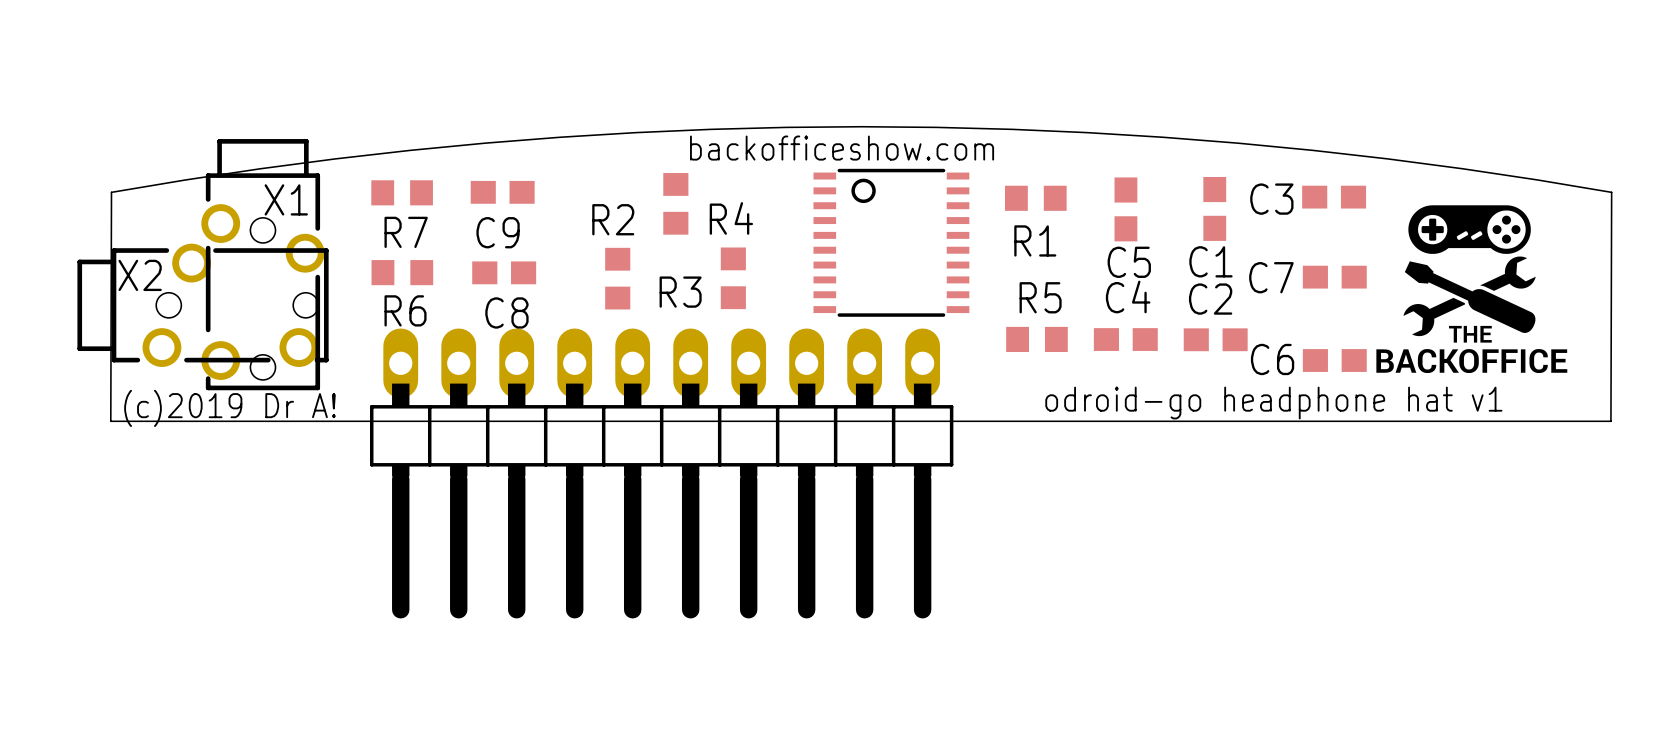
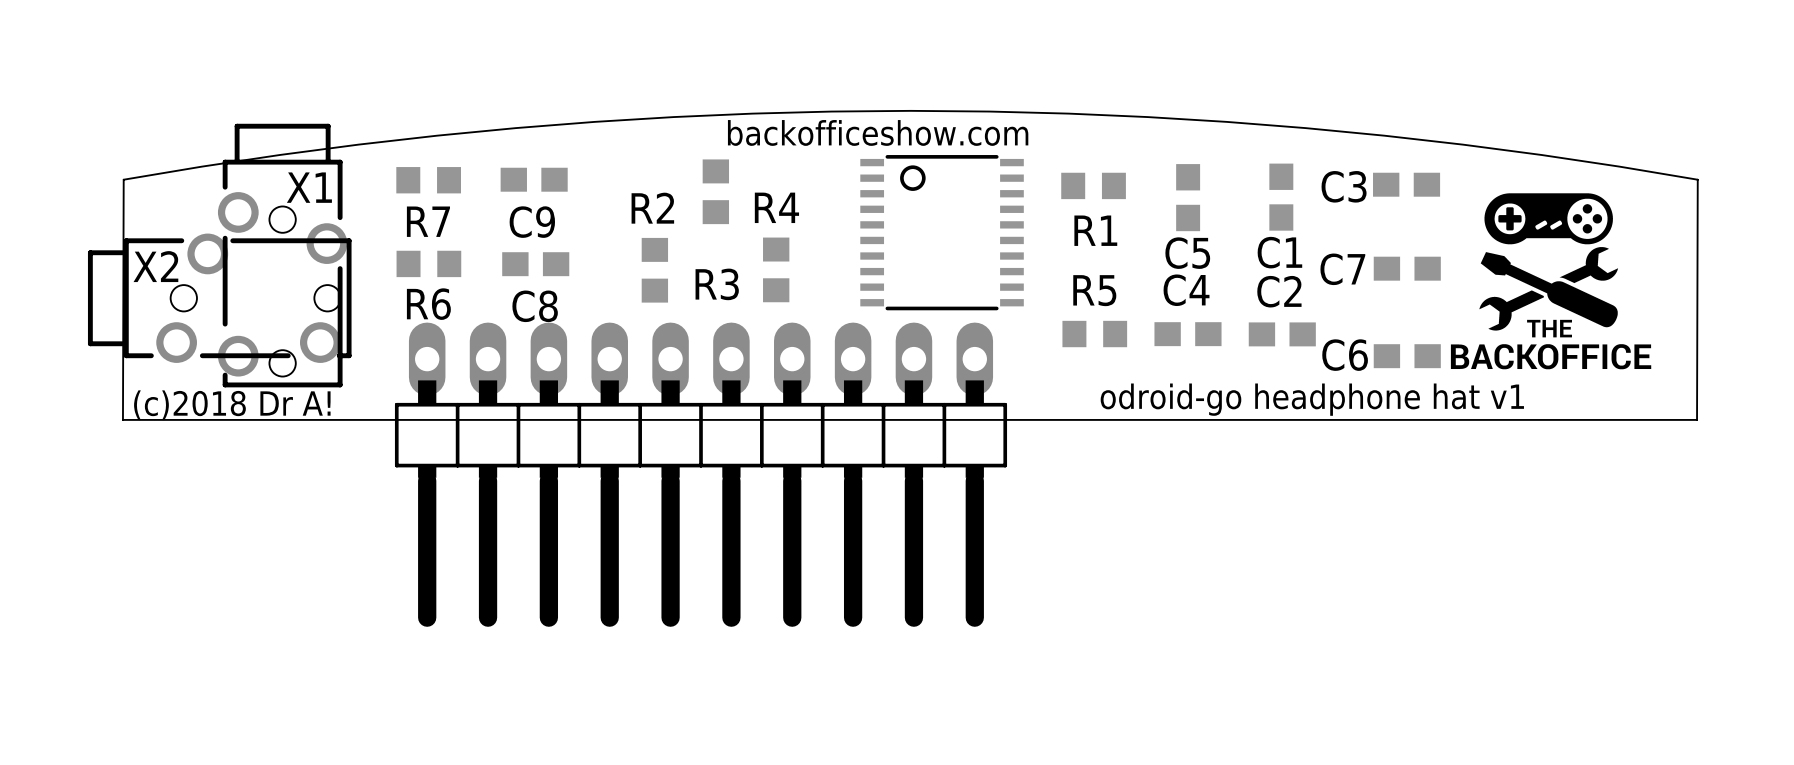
text: (c)2019 Dr A! (229, 408) -> (c)2018 Dr A! (232, 405)

